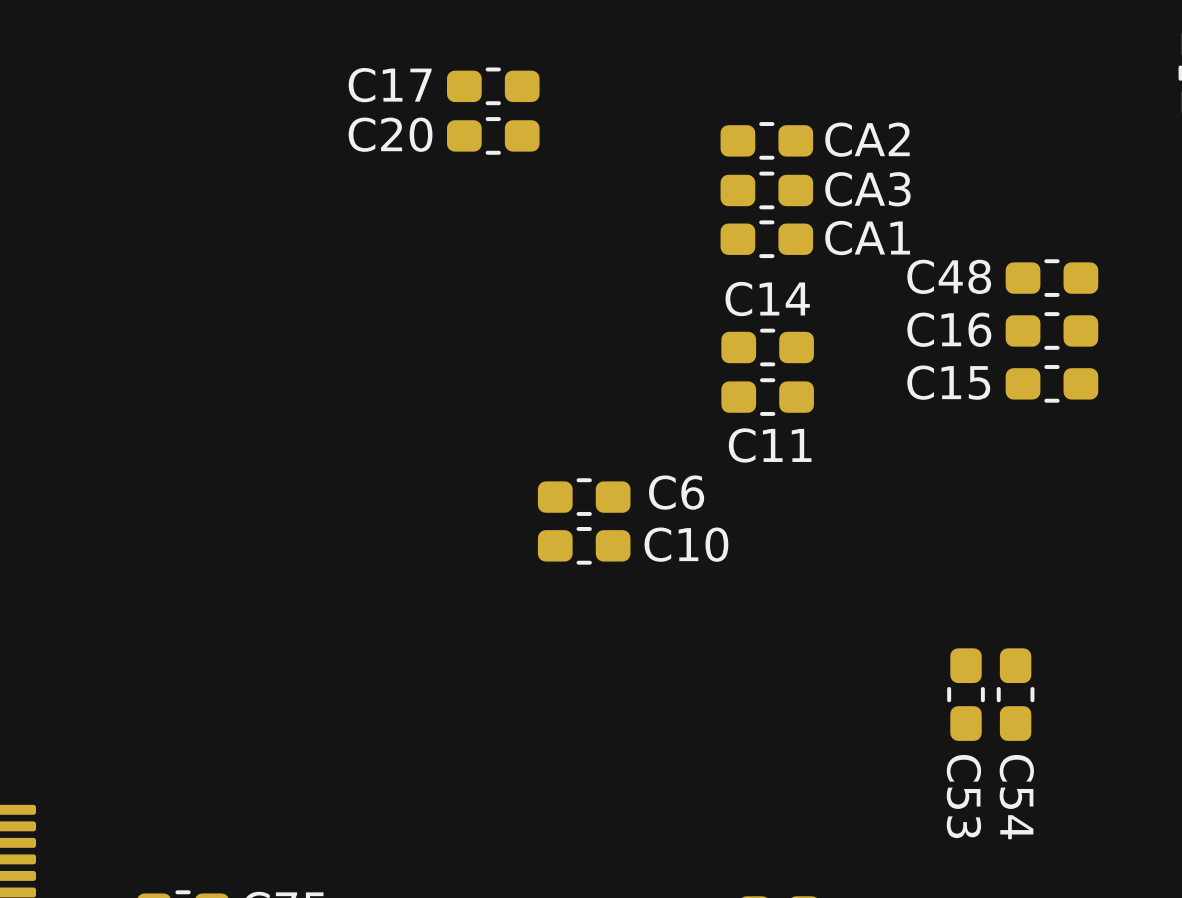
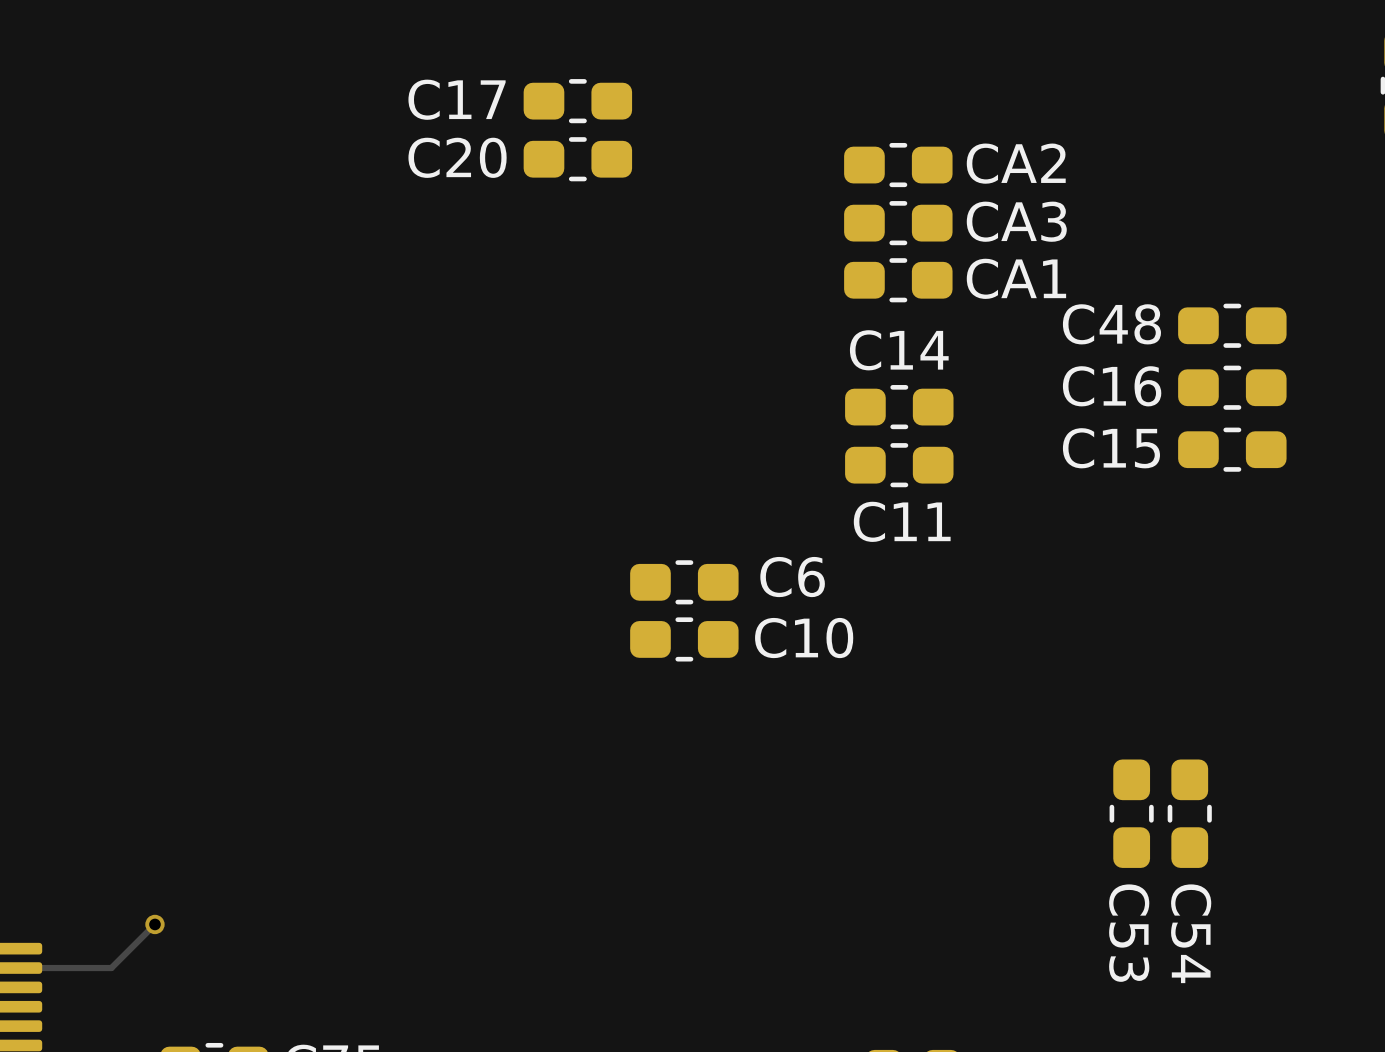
track: none -> (154, 924) (111, 968) (13, 968)
via: none -> (154, 924)

